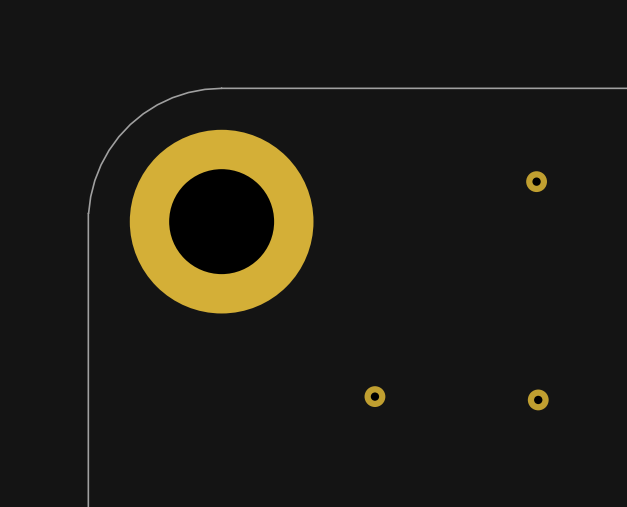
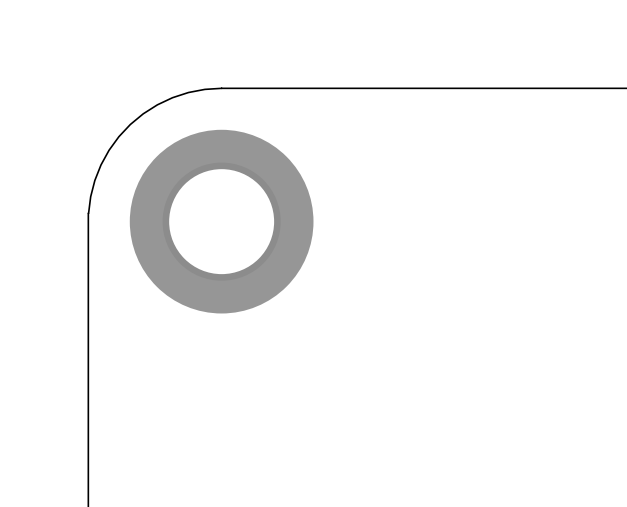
via: (536, 181) -> none
via: (374, 396) -> none
via: (538, 399) -> none

